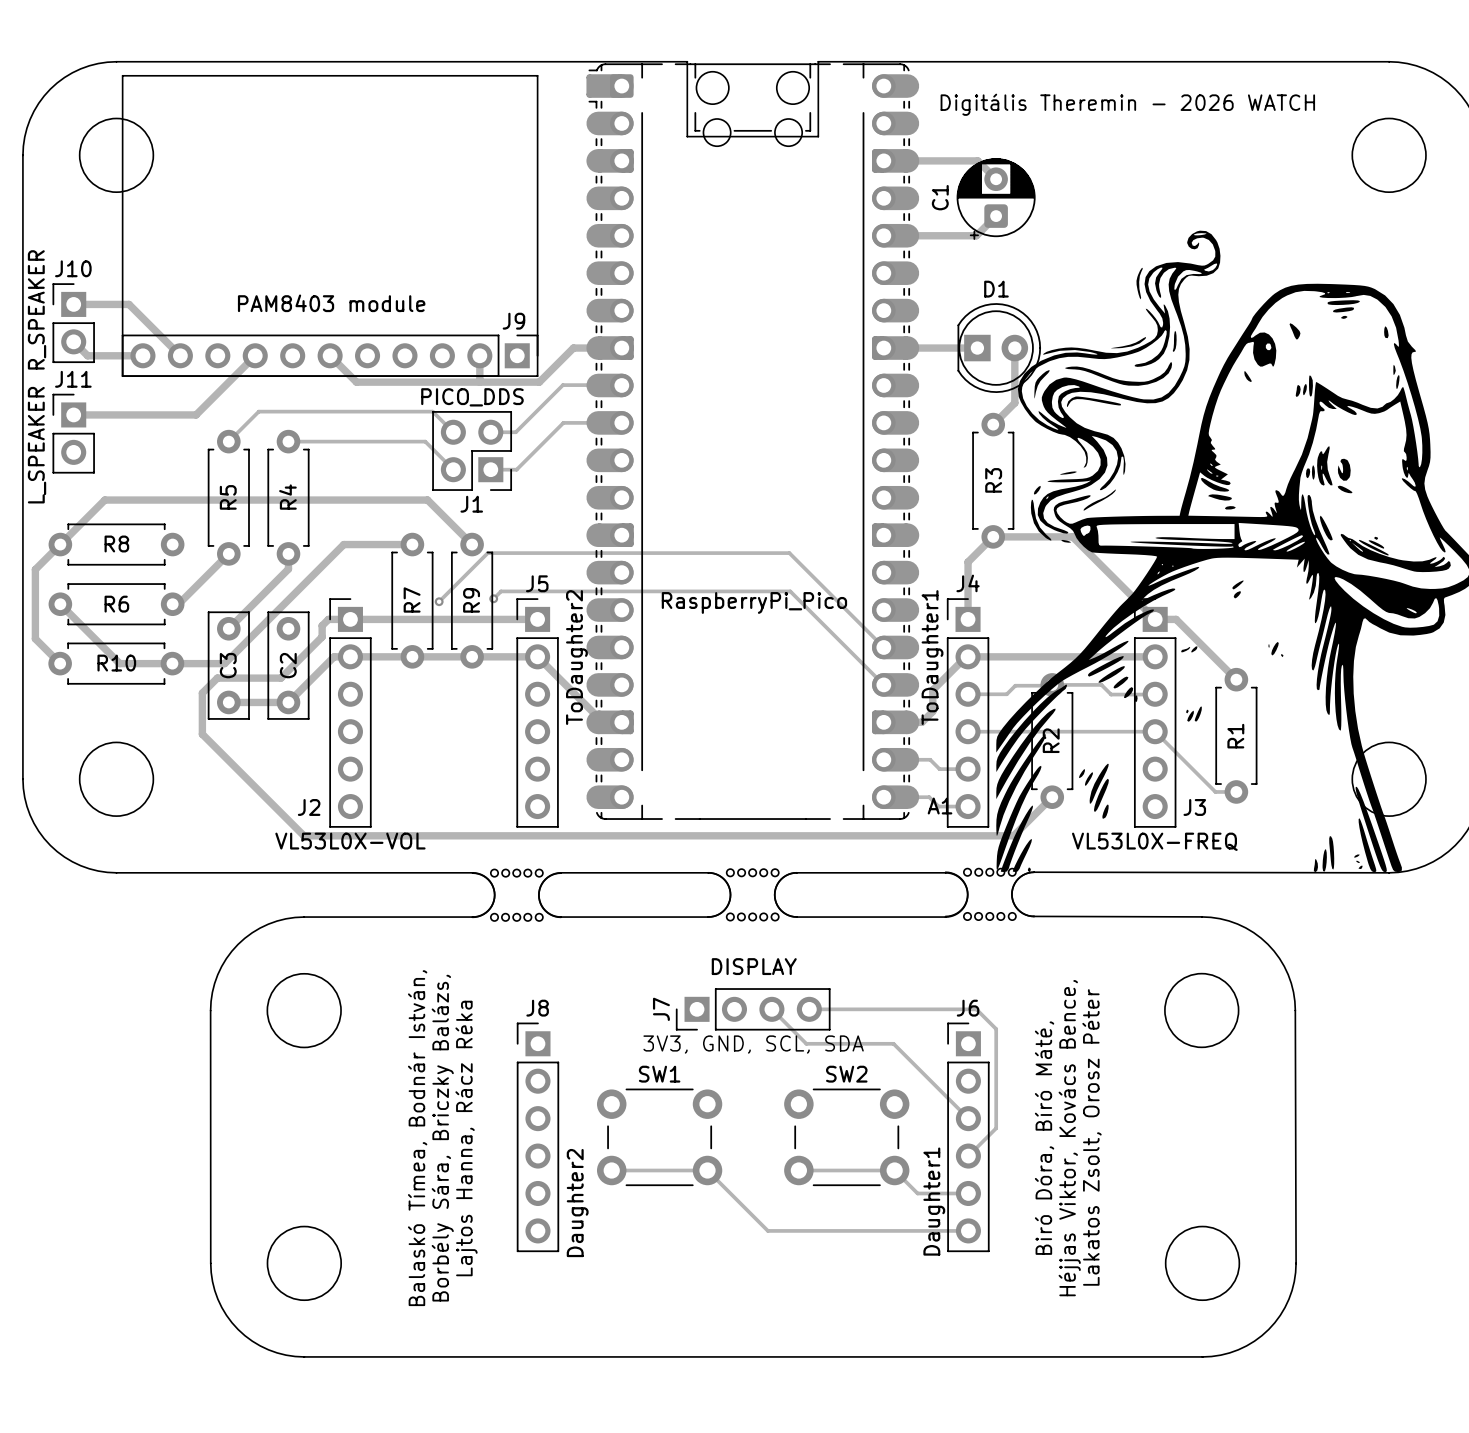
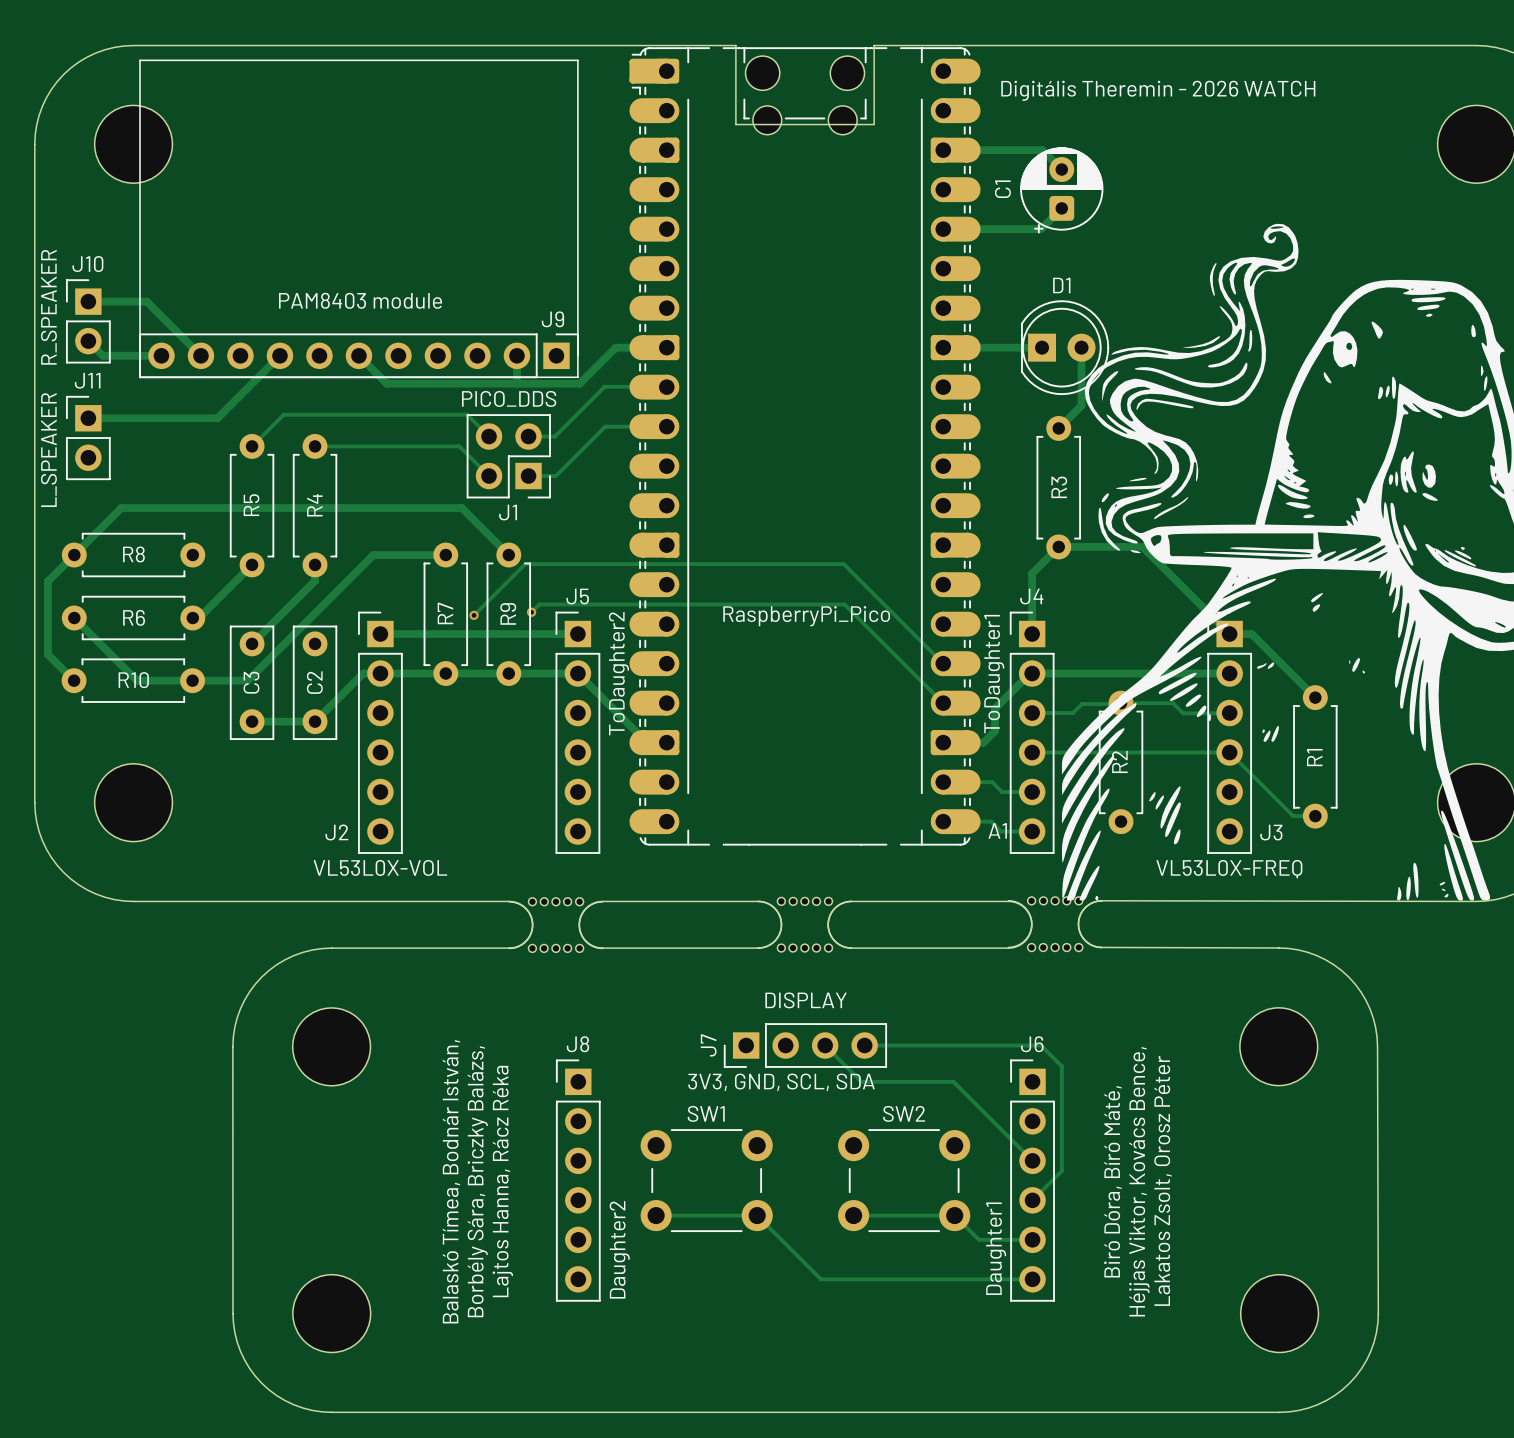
track: (350, 619) (328, 619) (322, 625) (322, 636) (280, 678) (217, 678) (202, 693) (202, 734) (303, 835) (1013, 835) (1052, 797) -> none

